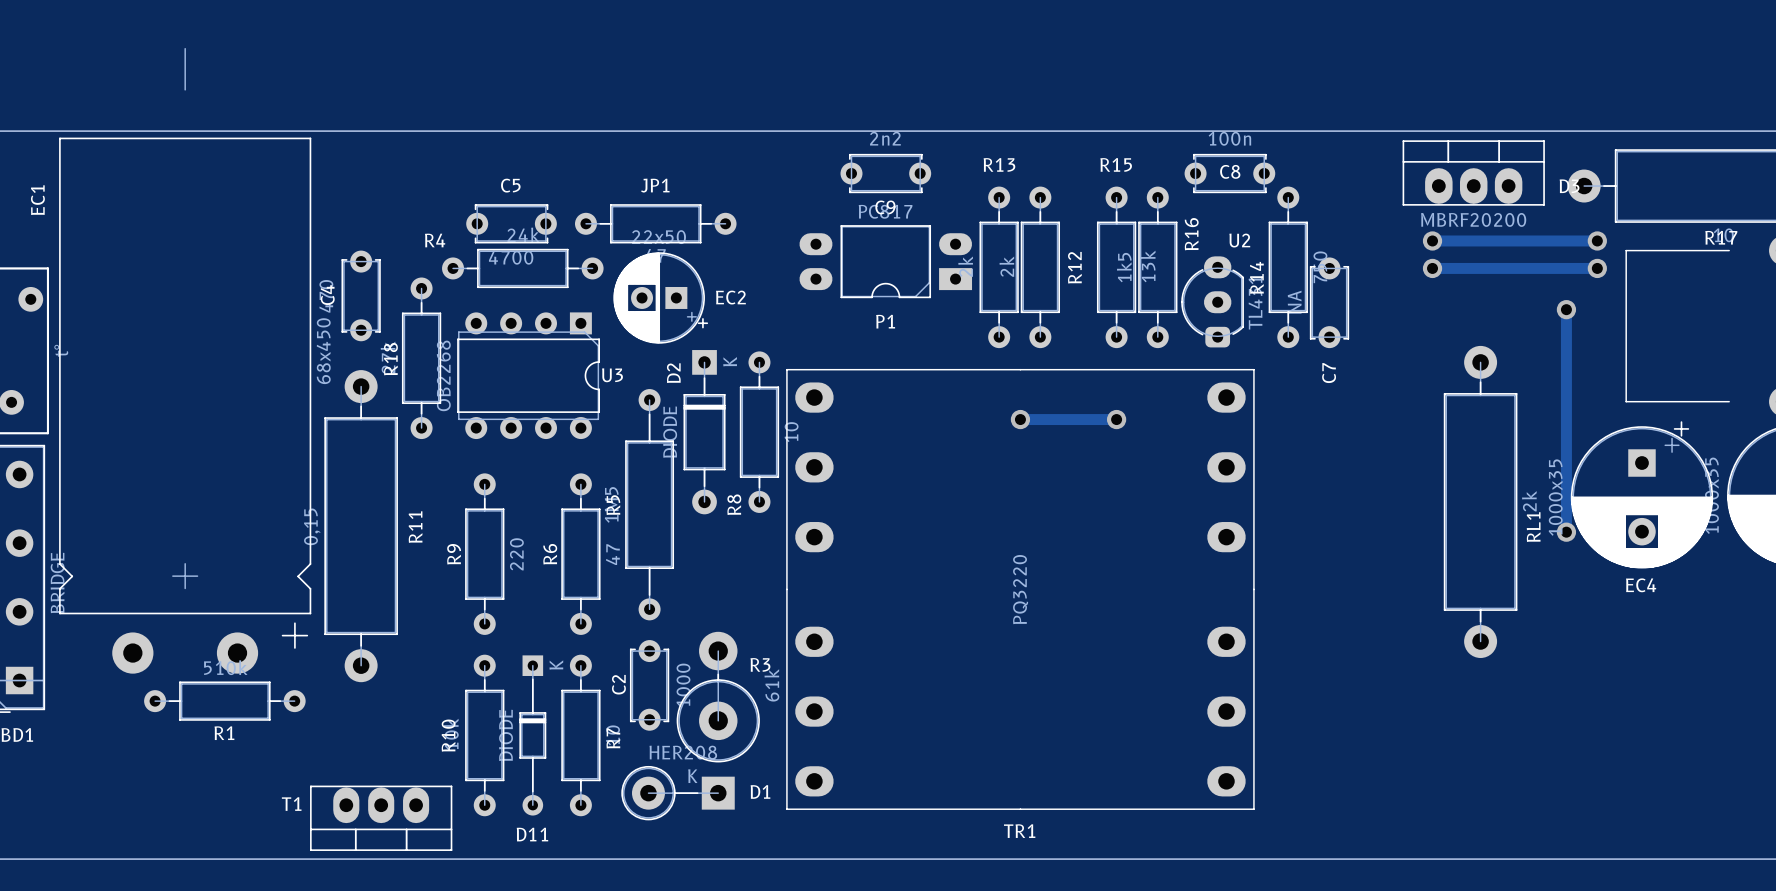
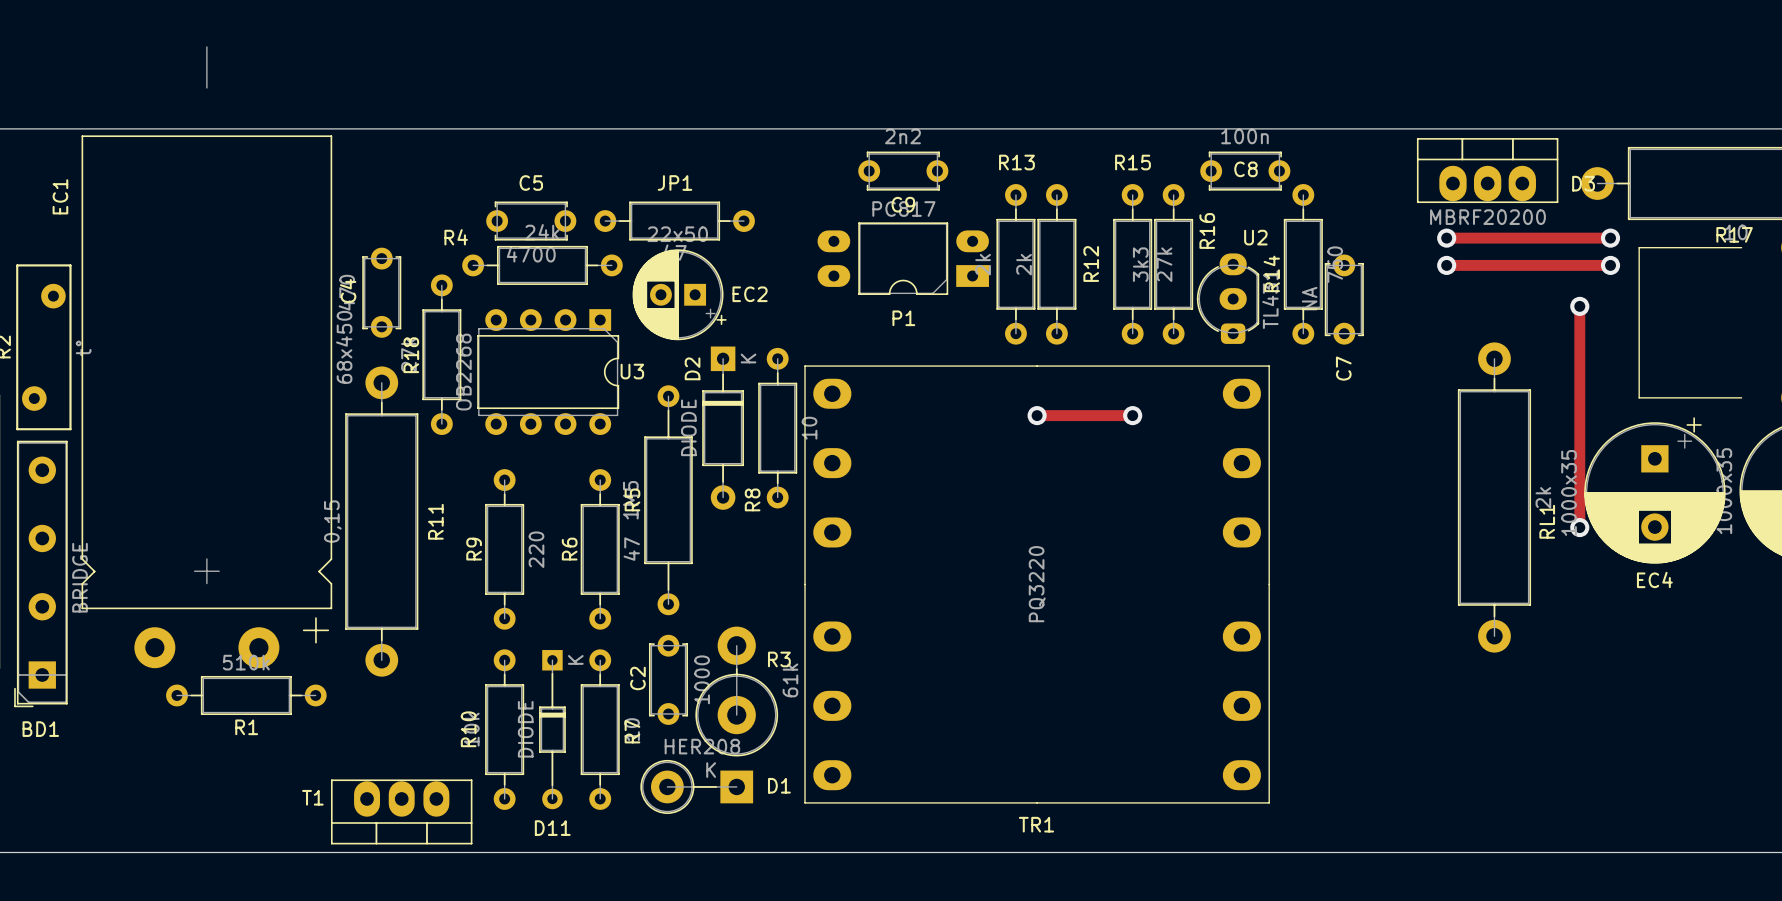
R15 value: 13k (1148, 266) -> 27k (1164, 264)
R16 value: 1k5 (1124, 267) -> 3k3 (1140, 264)

